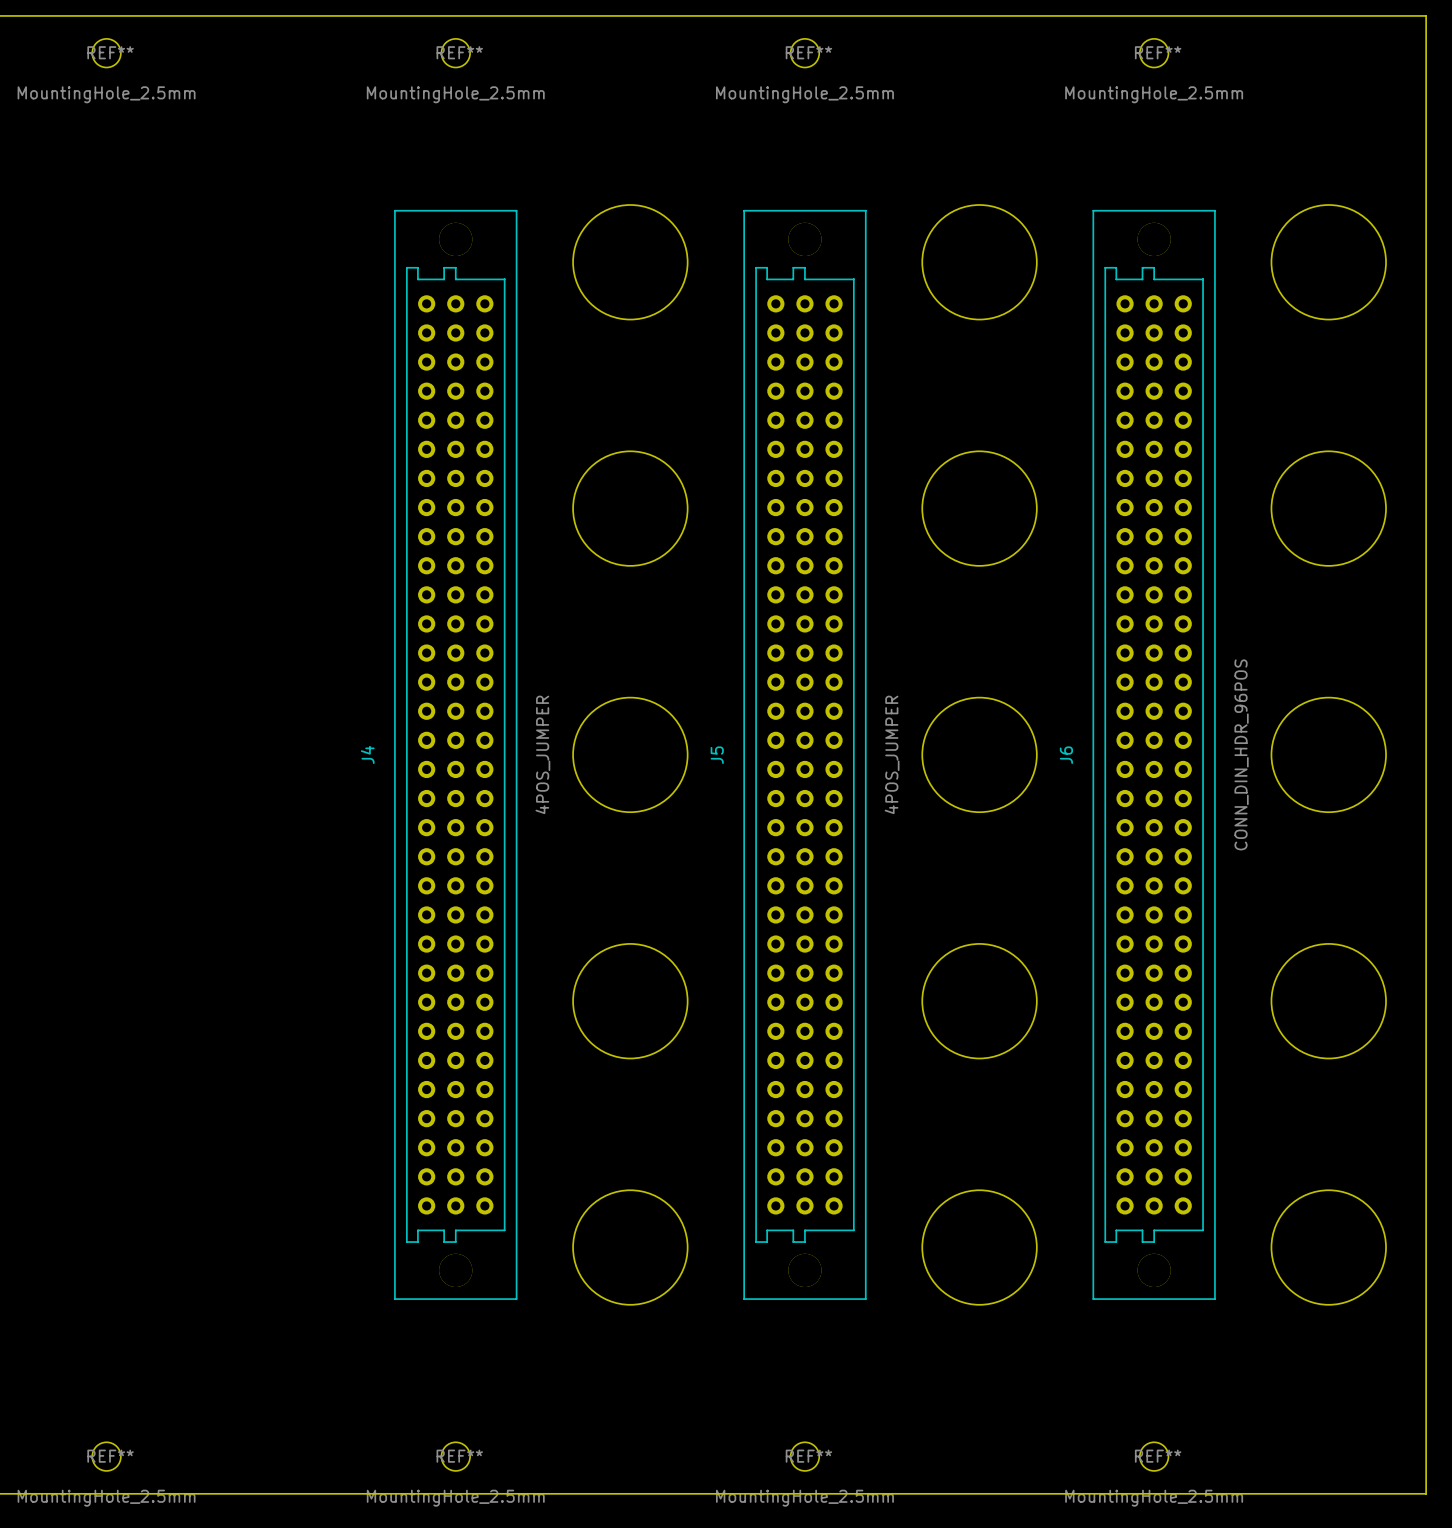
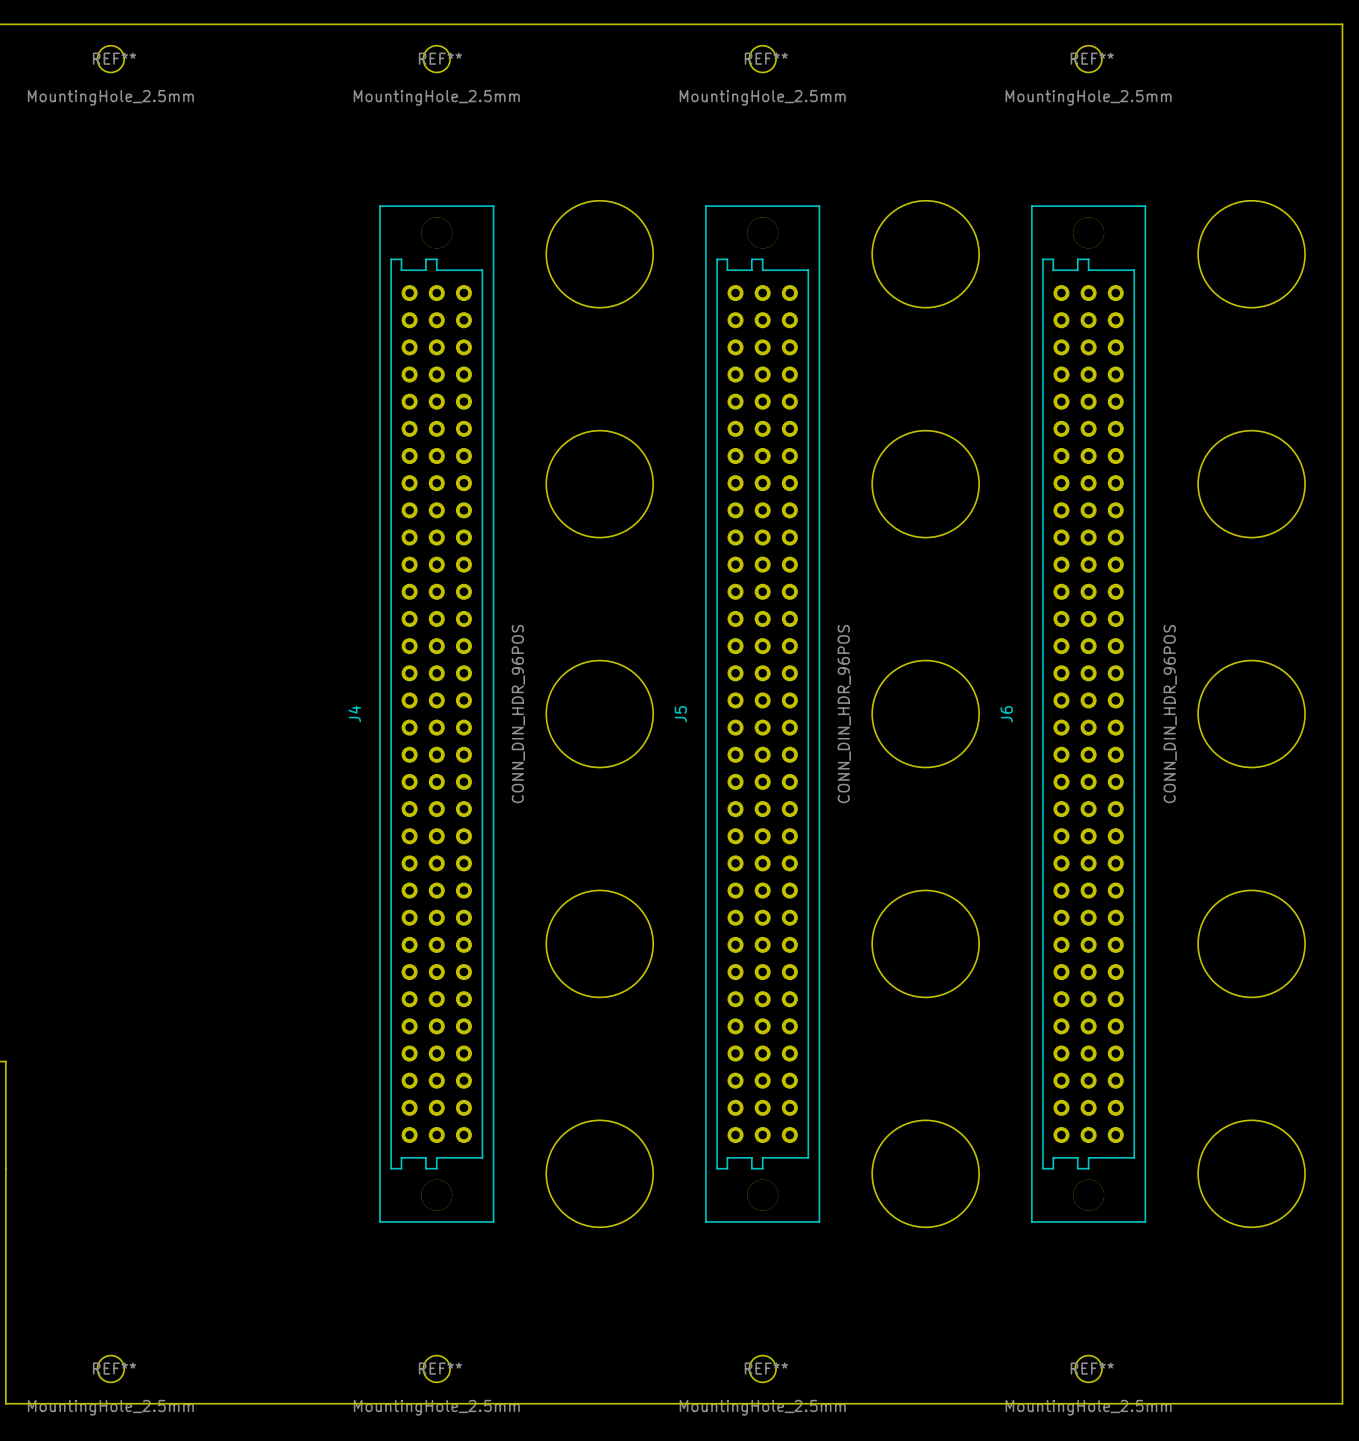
J4 value: 4POS_JUMPER (542, 754) -> CONN_DIN_HDR_96POS (518, 714)
J5 value: 4POS_JUMPER (892, 754) -> CONN_DIN_HDR_96POS (844, 714)

